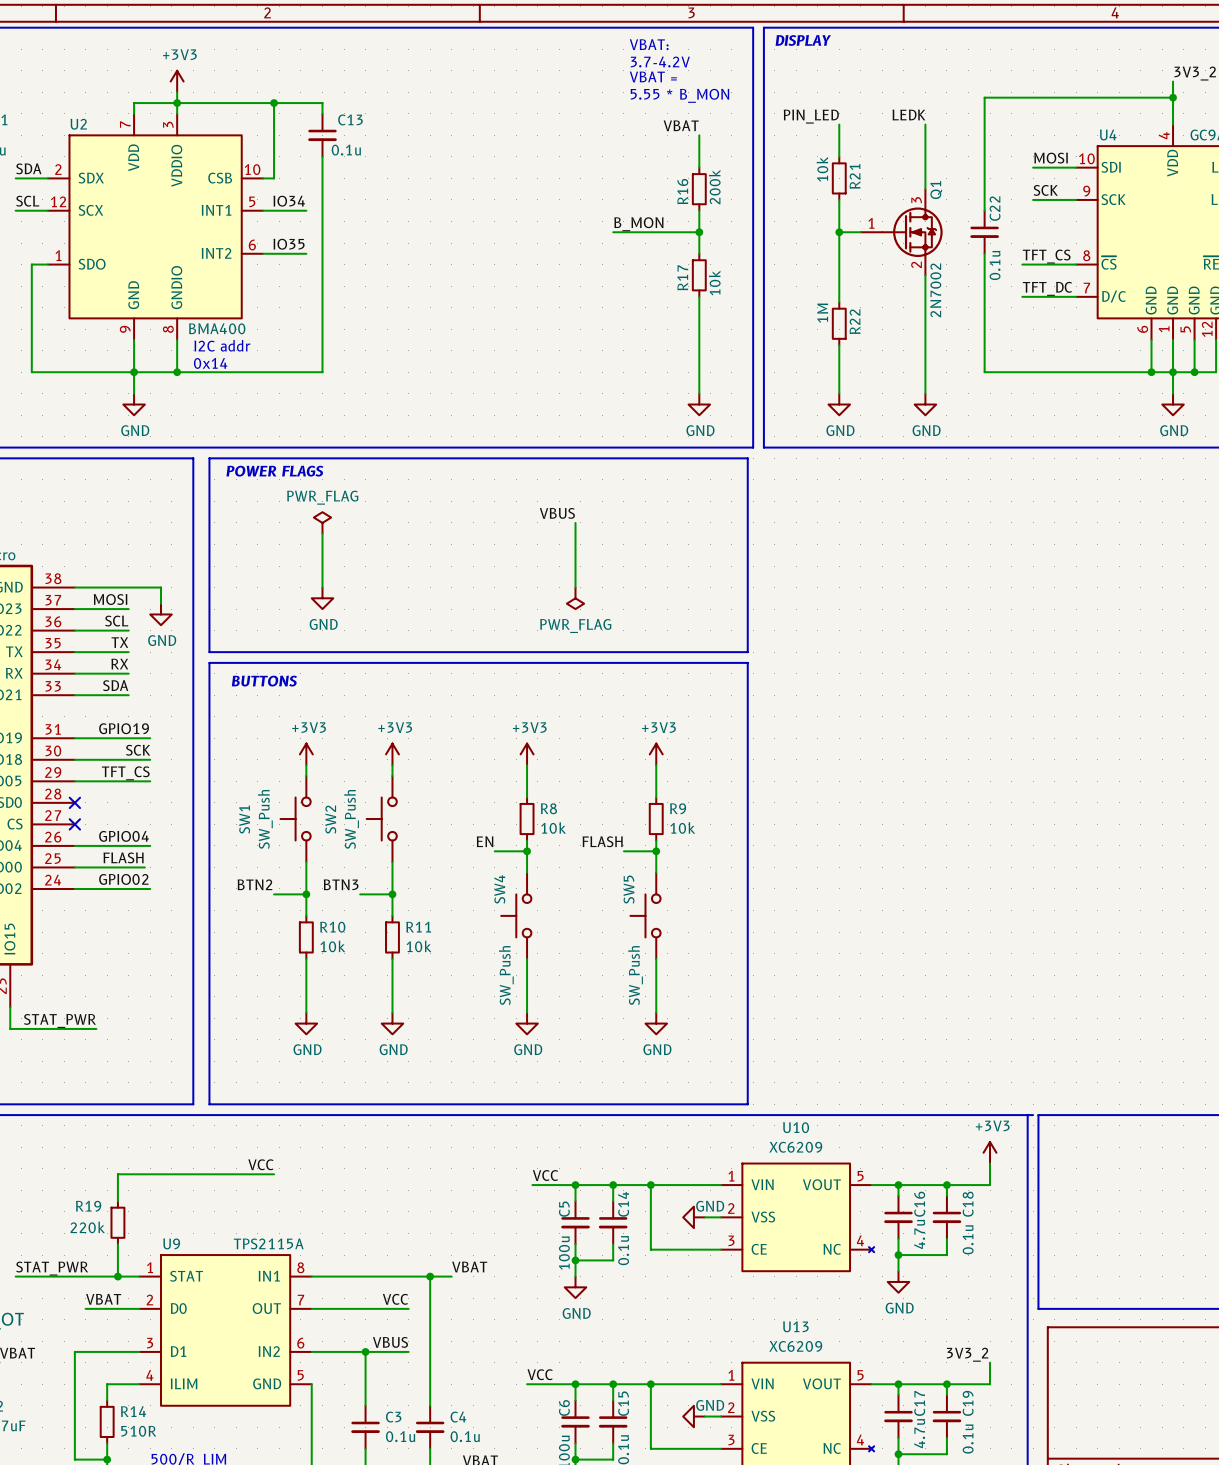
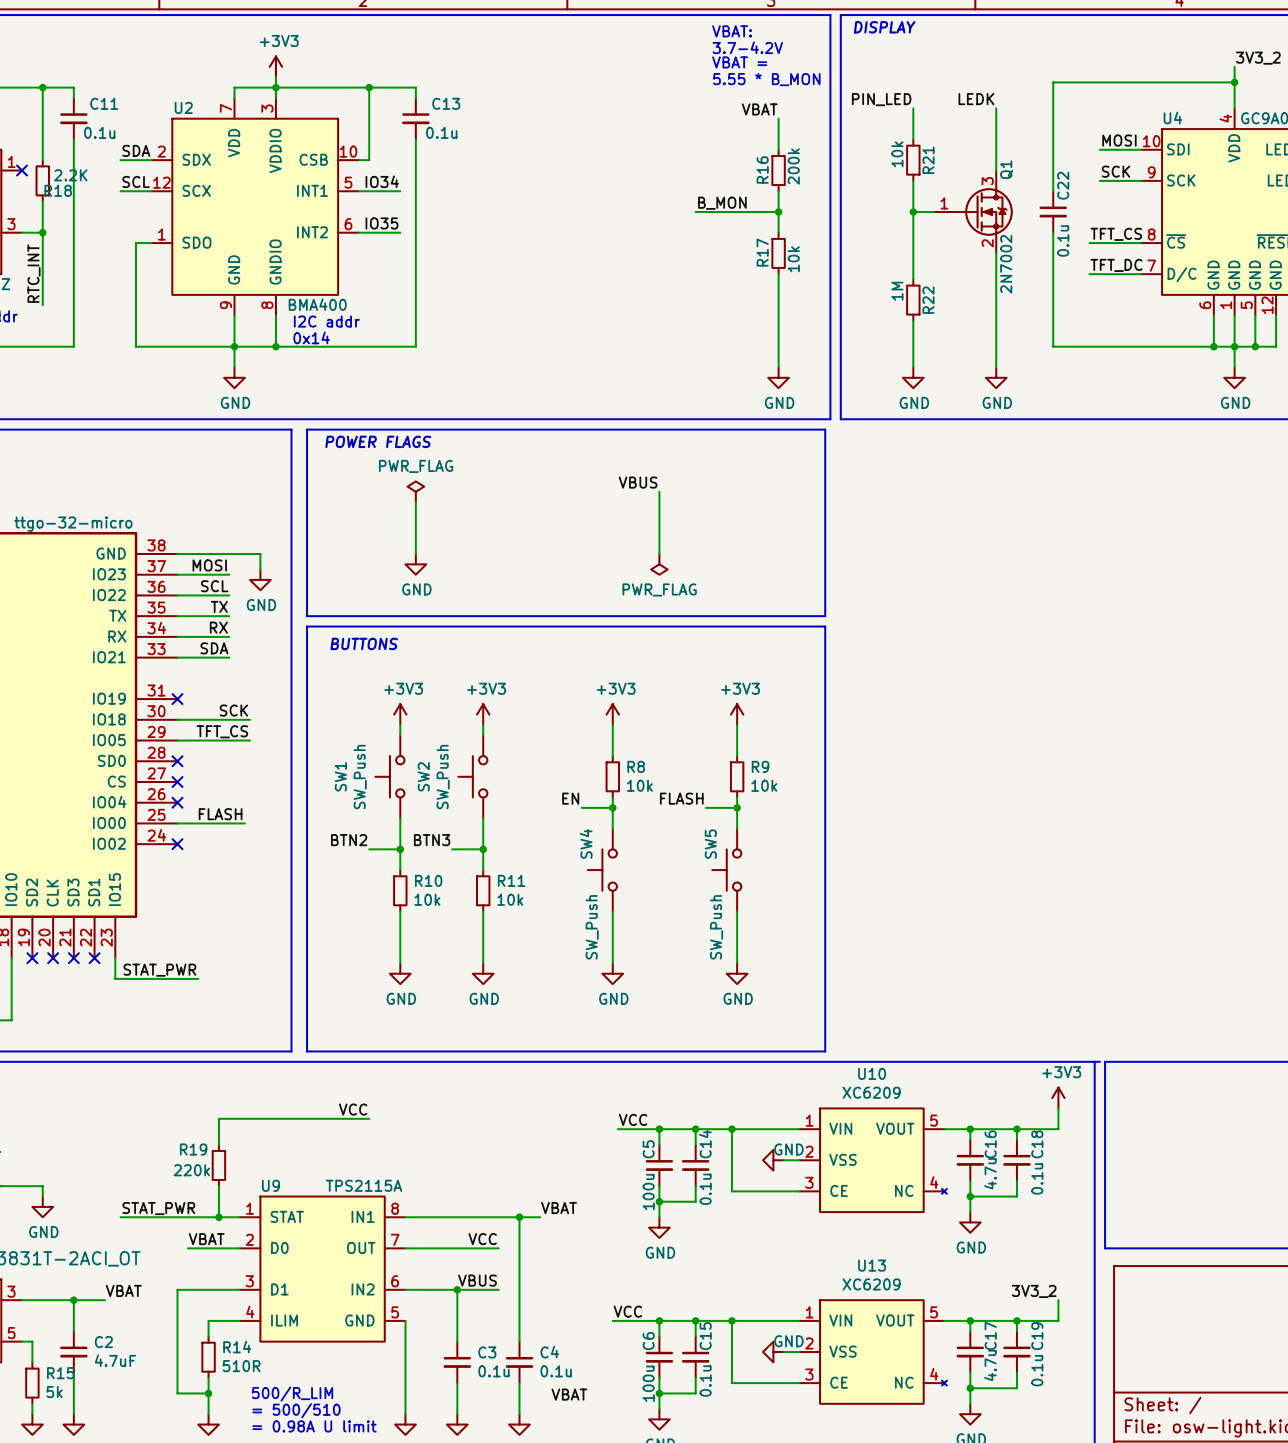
label: GPIO19 (124, 728) -> none
wire: (74, 738) (150, 738) -> none
no-connect mark: none -> (177, 699)
label: GPIO04 (123, 836) -> none
wire: (74, 845) (150, 845) -> none
no-connect mark: none -> (177, 802)
label: GPIO02 (123, 879) -> none
wire: (74, 888) (150, 888) -> none
no-connect mark: none -> (177, 844)

